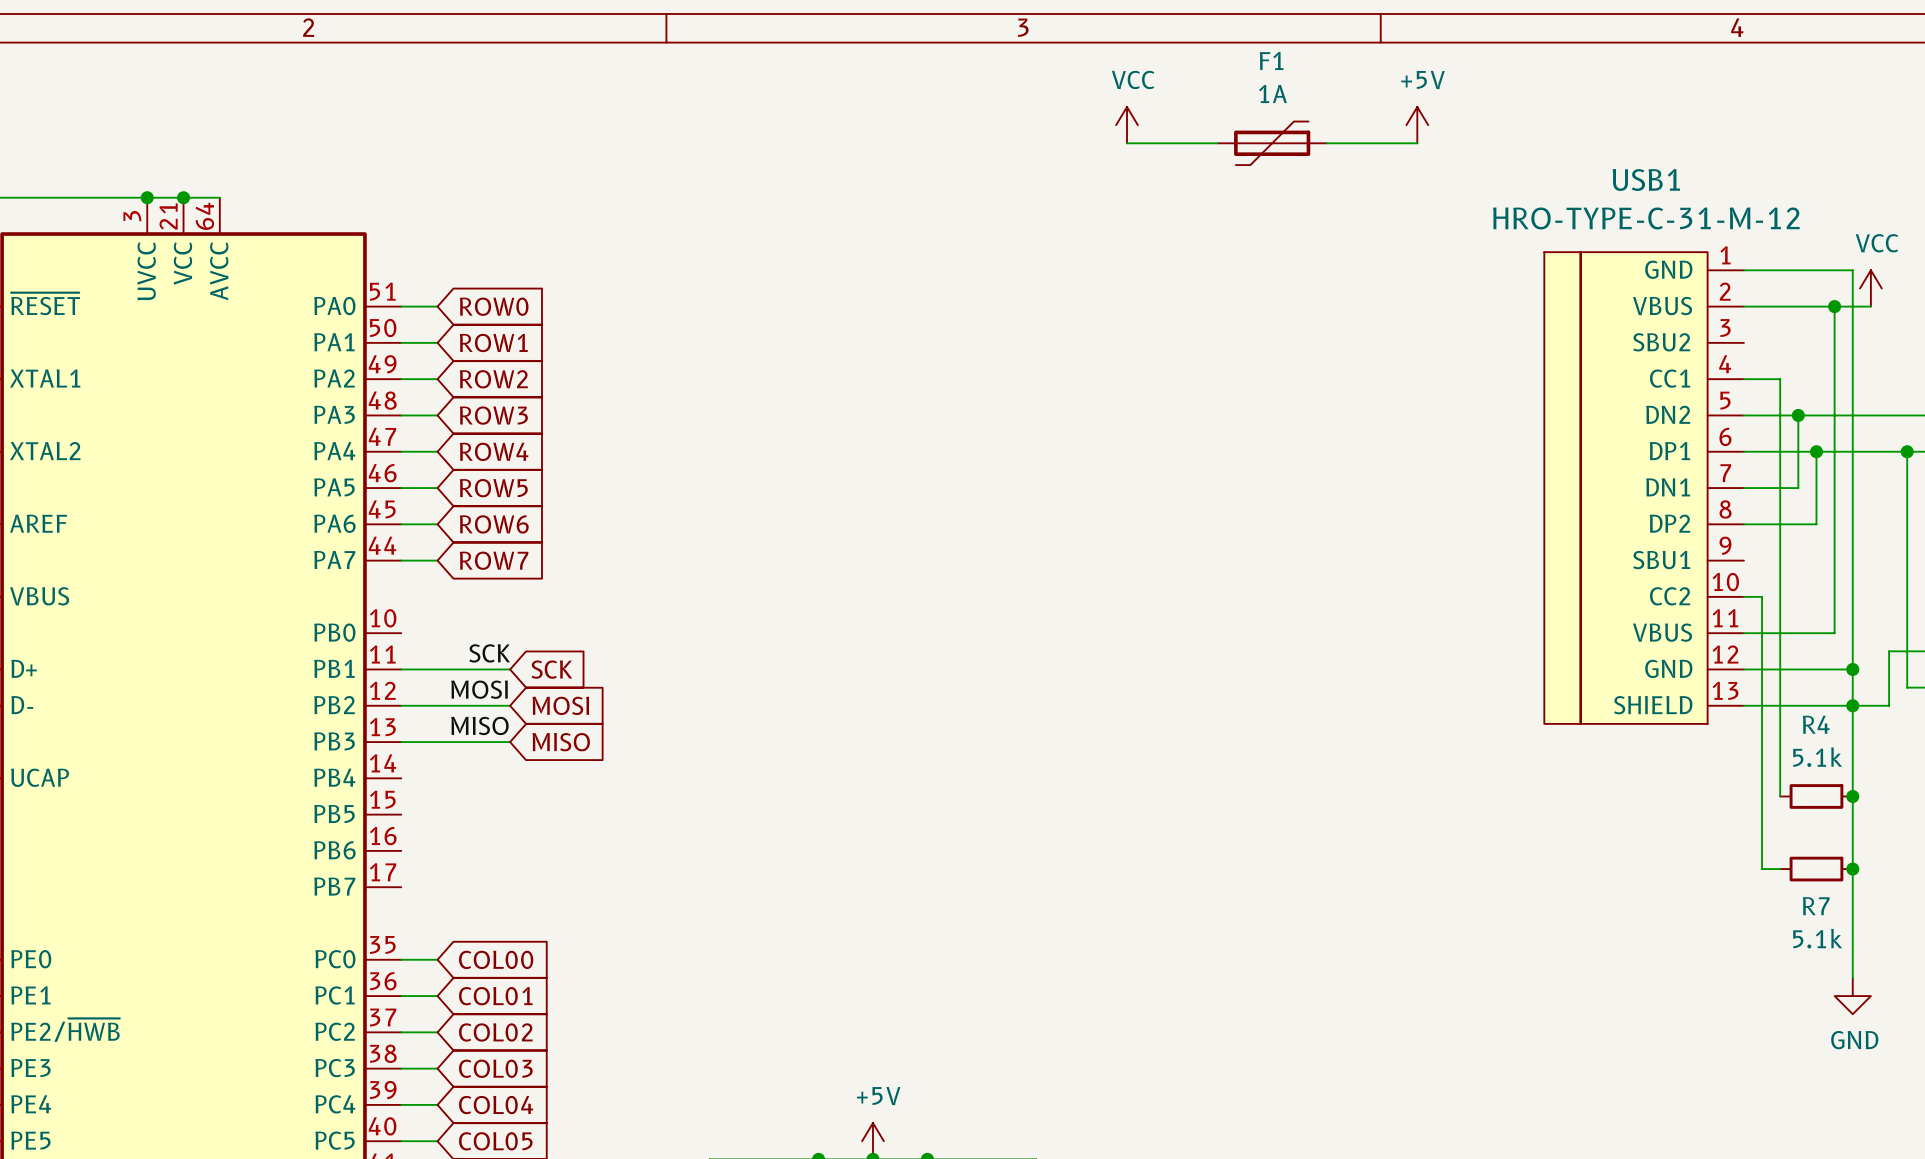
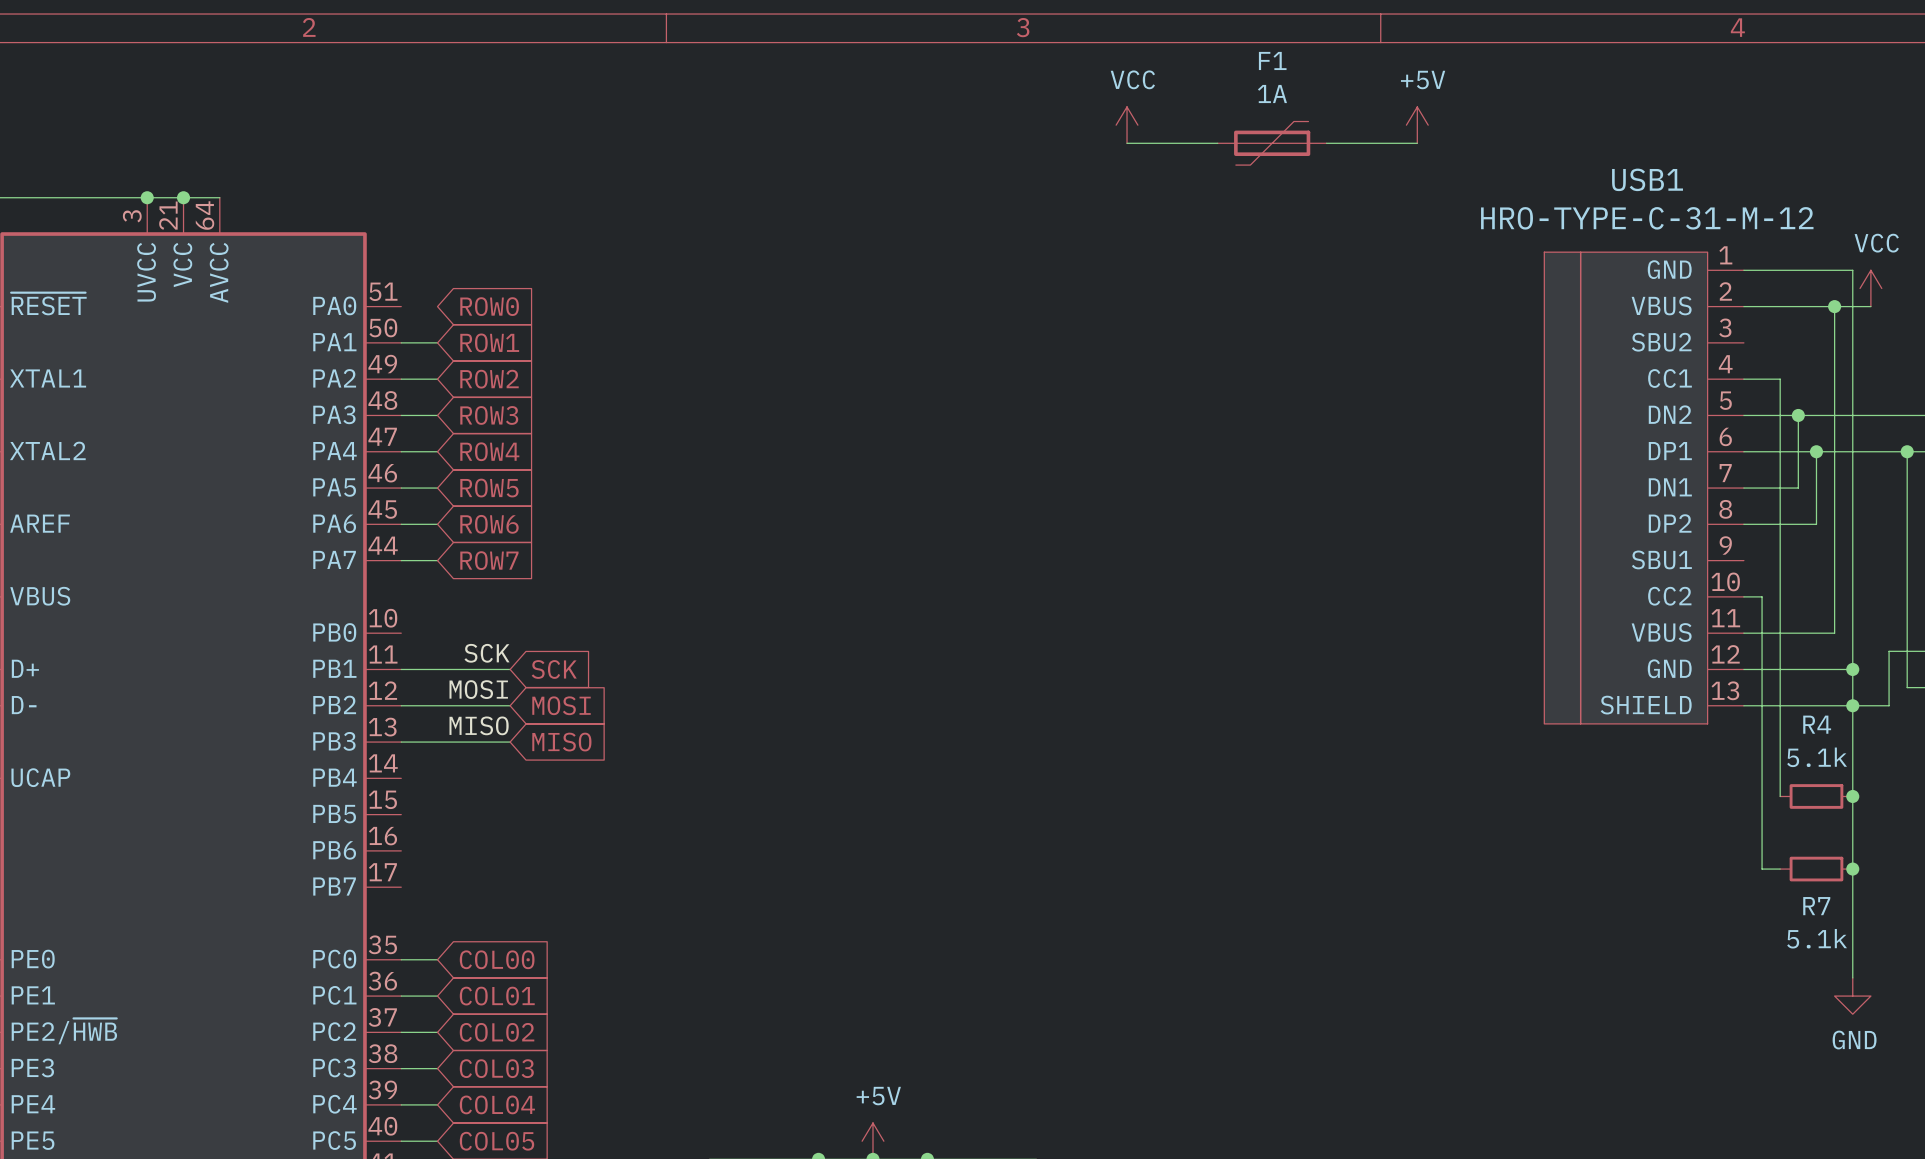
wire: (401, 306) (437, 306) -> none

